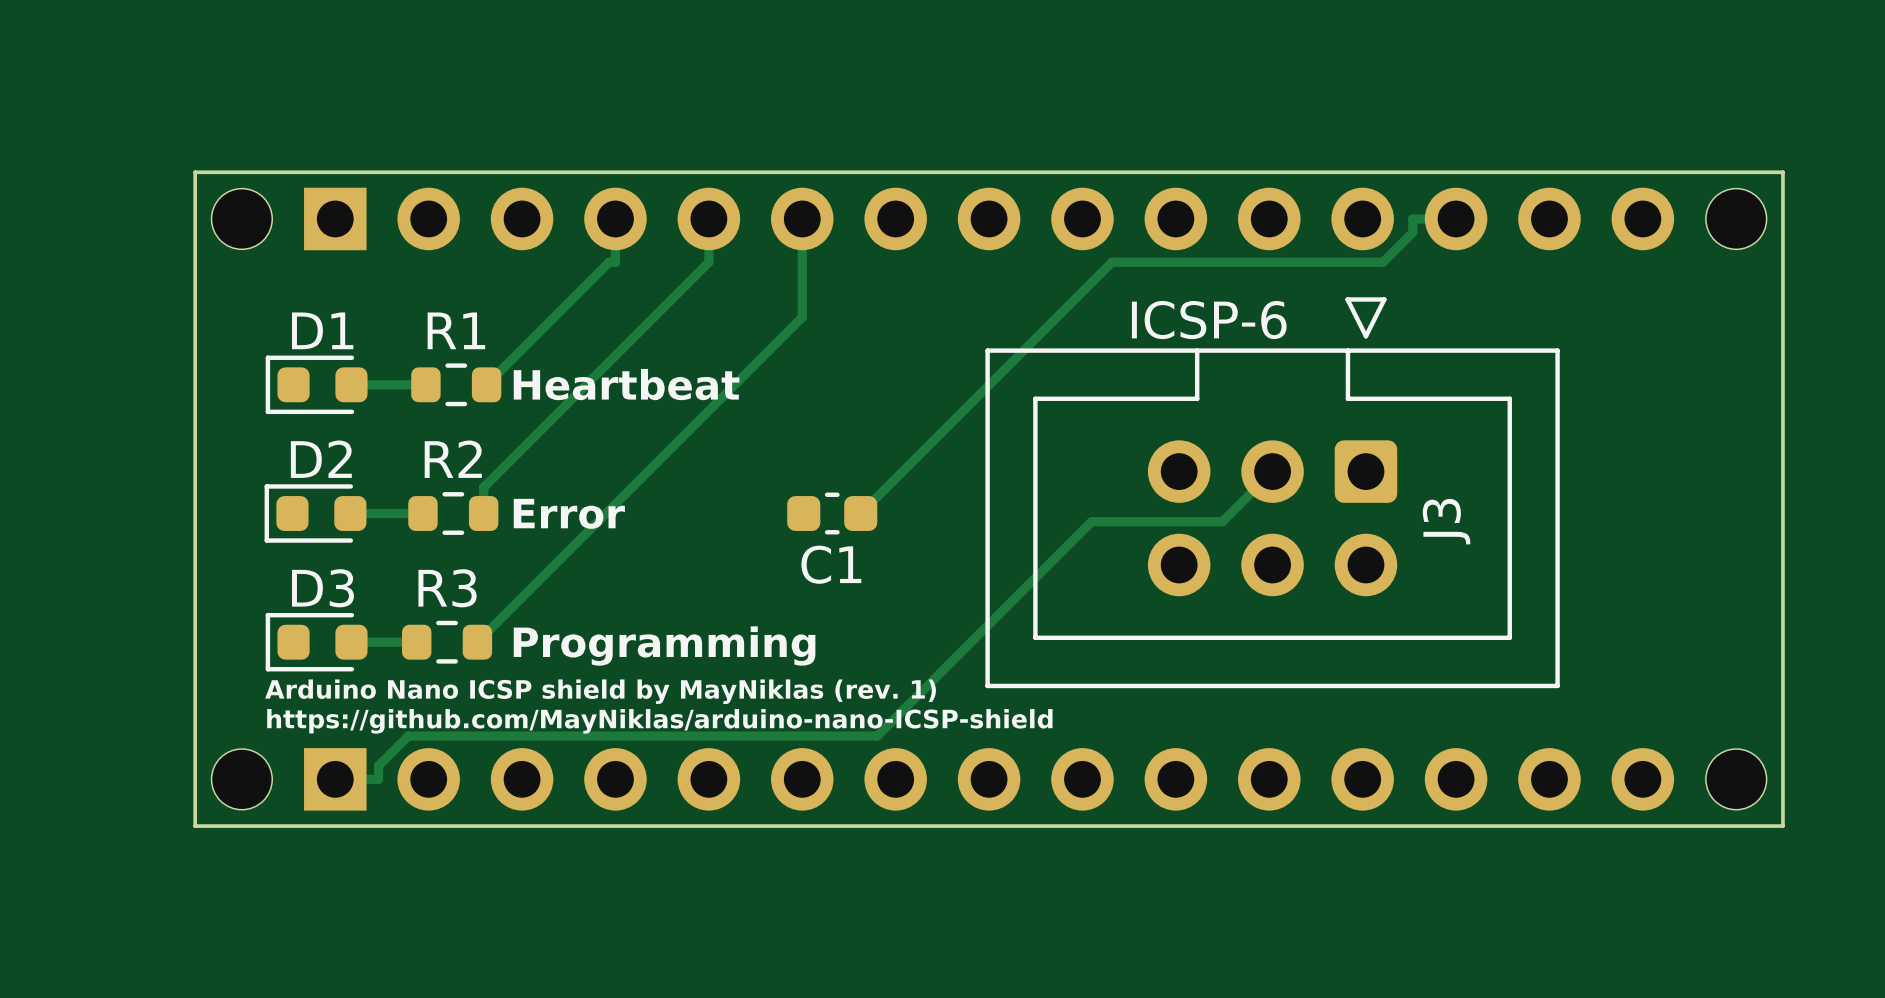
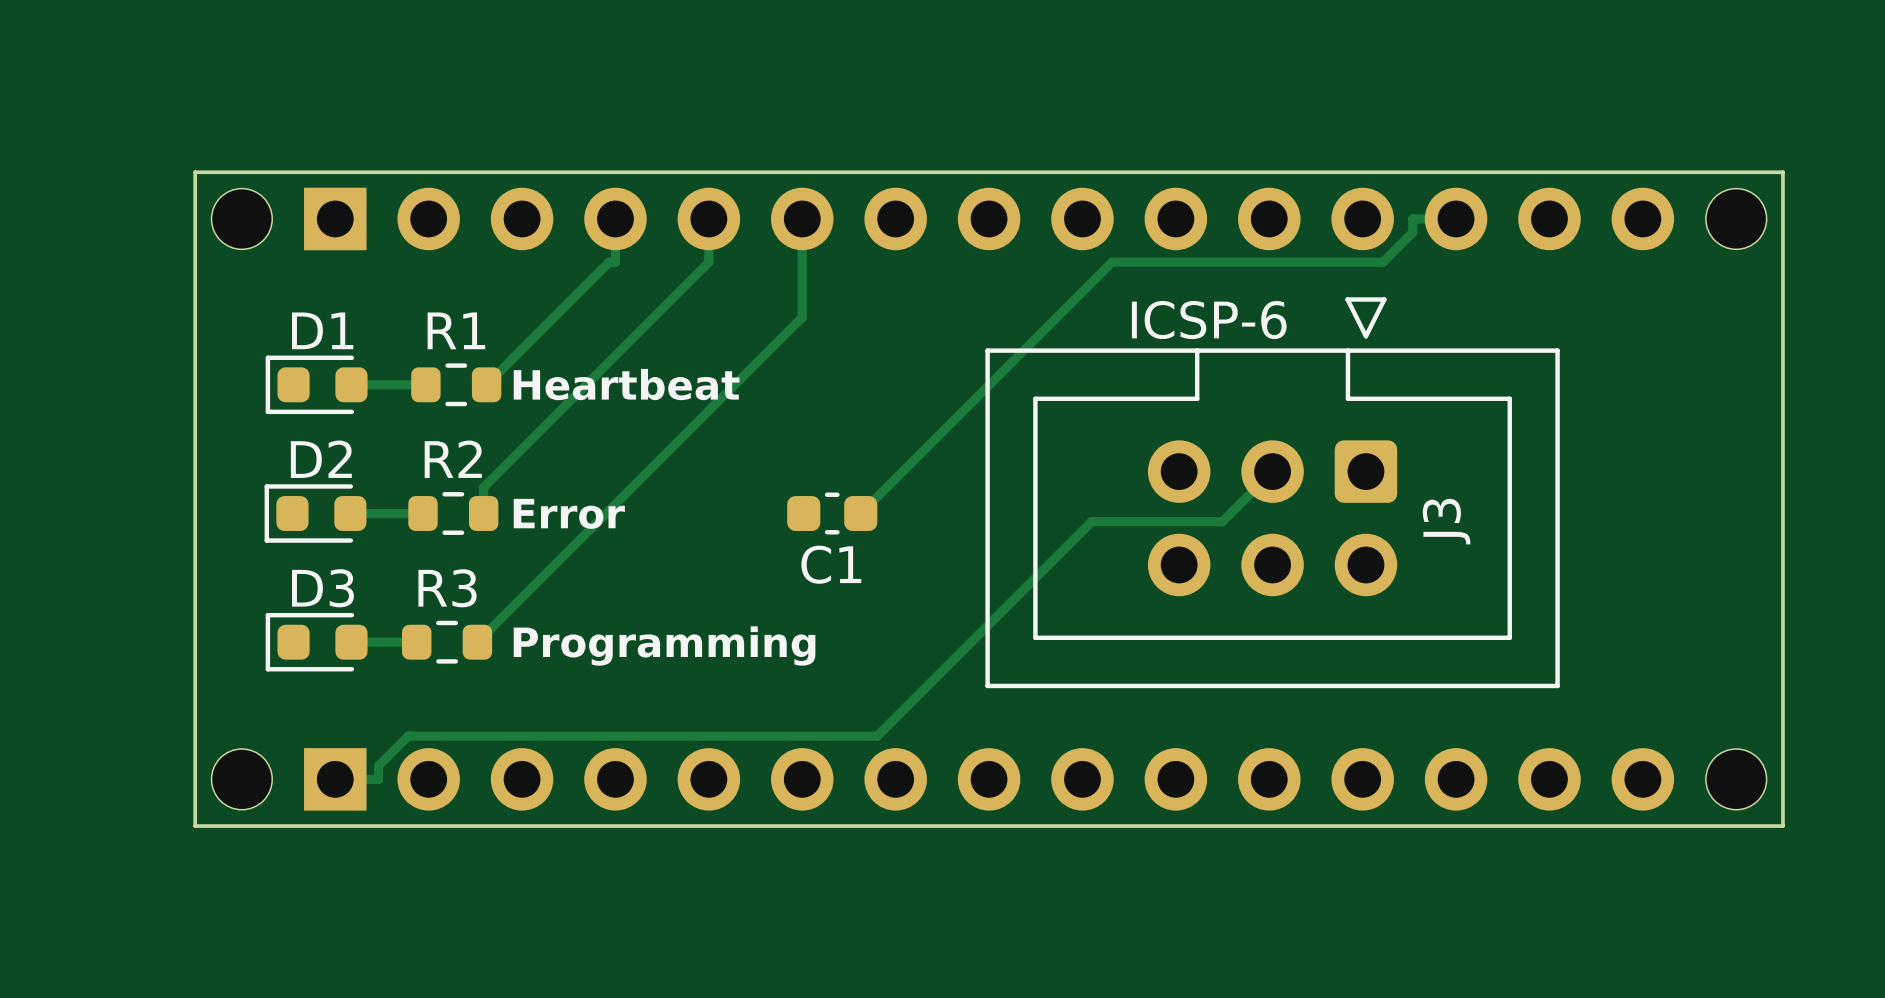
text: Arduino Nano ICSP shield by MayNiklas (rev. 1) (600, 691) -> none
text: https://github.com/MayNiklas/arduino-nano-ICSP-shield (659, 721) -> none

